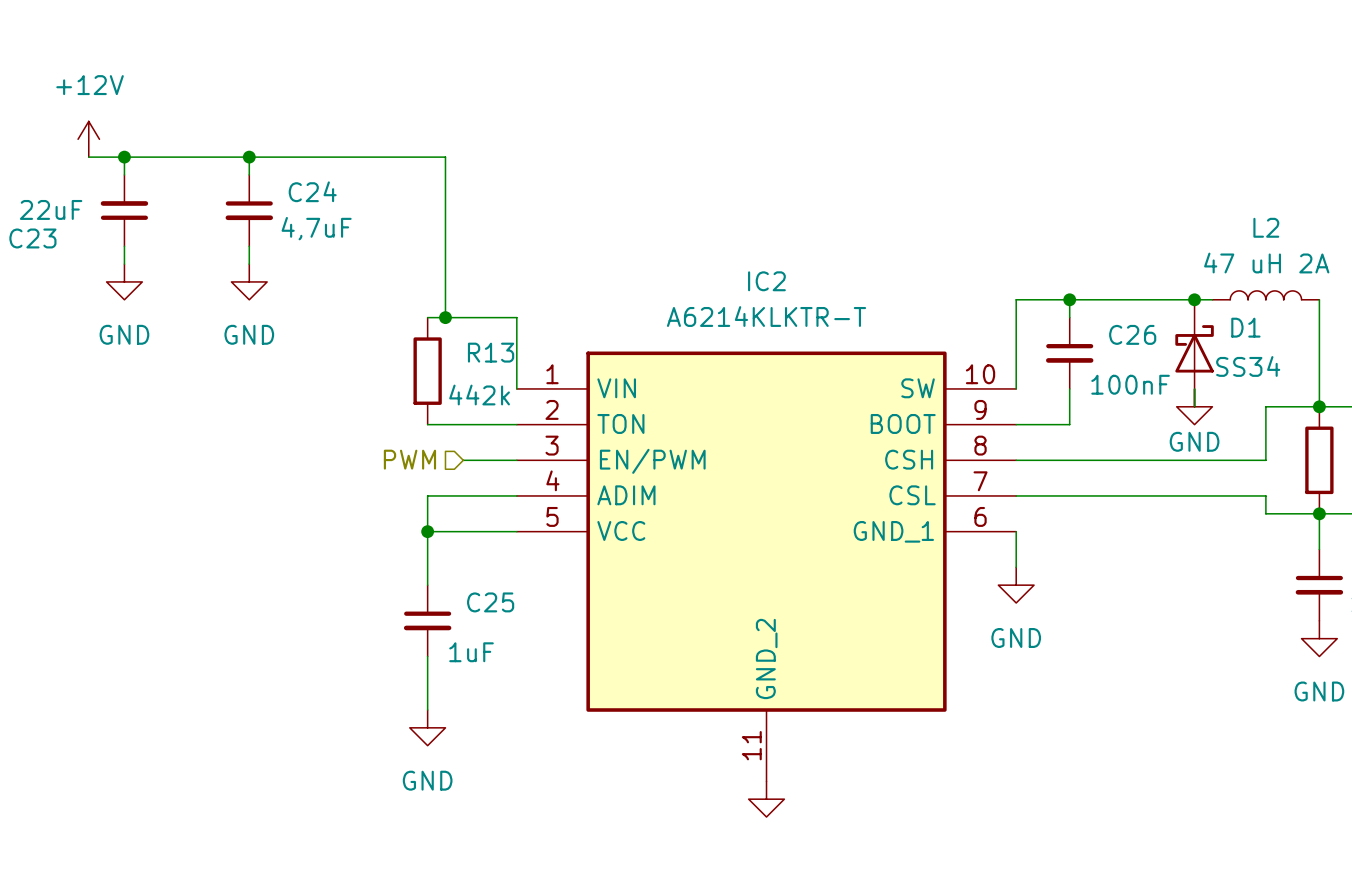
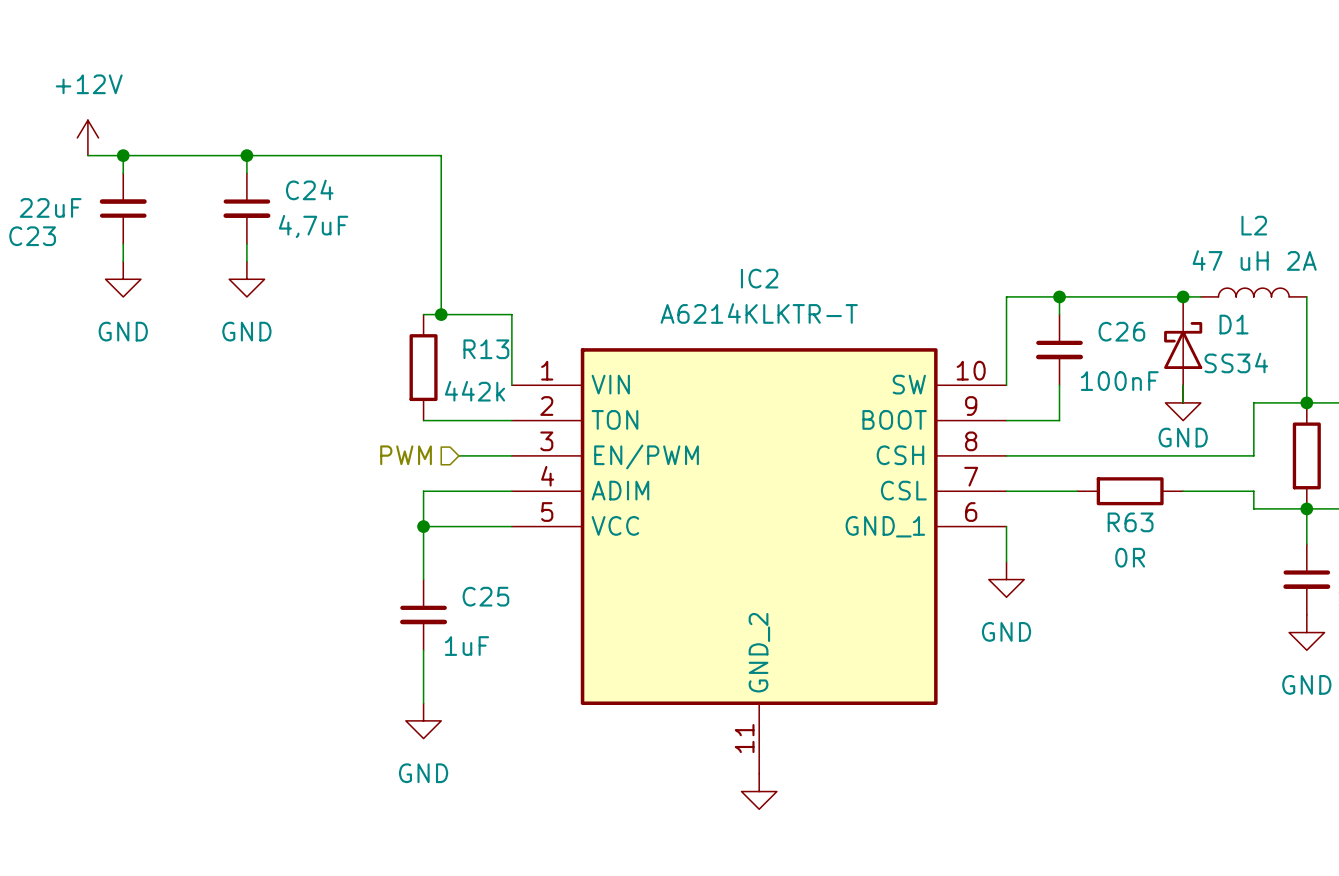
wire: (1087, 495) (1194, 495) -> none
R63: none -> 0R (1130, 491)

